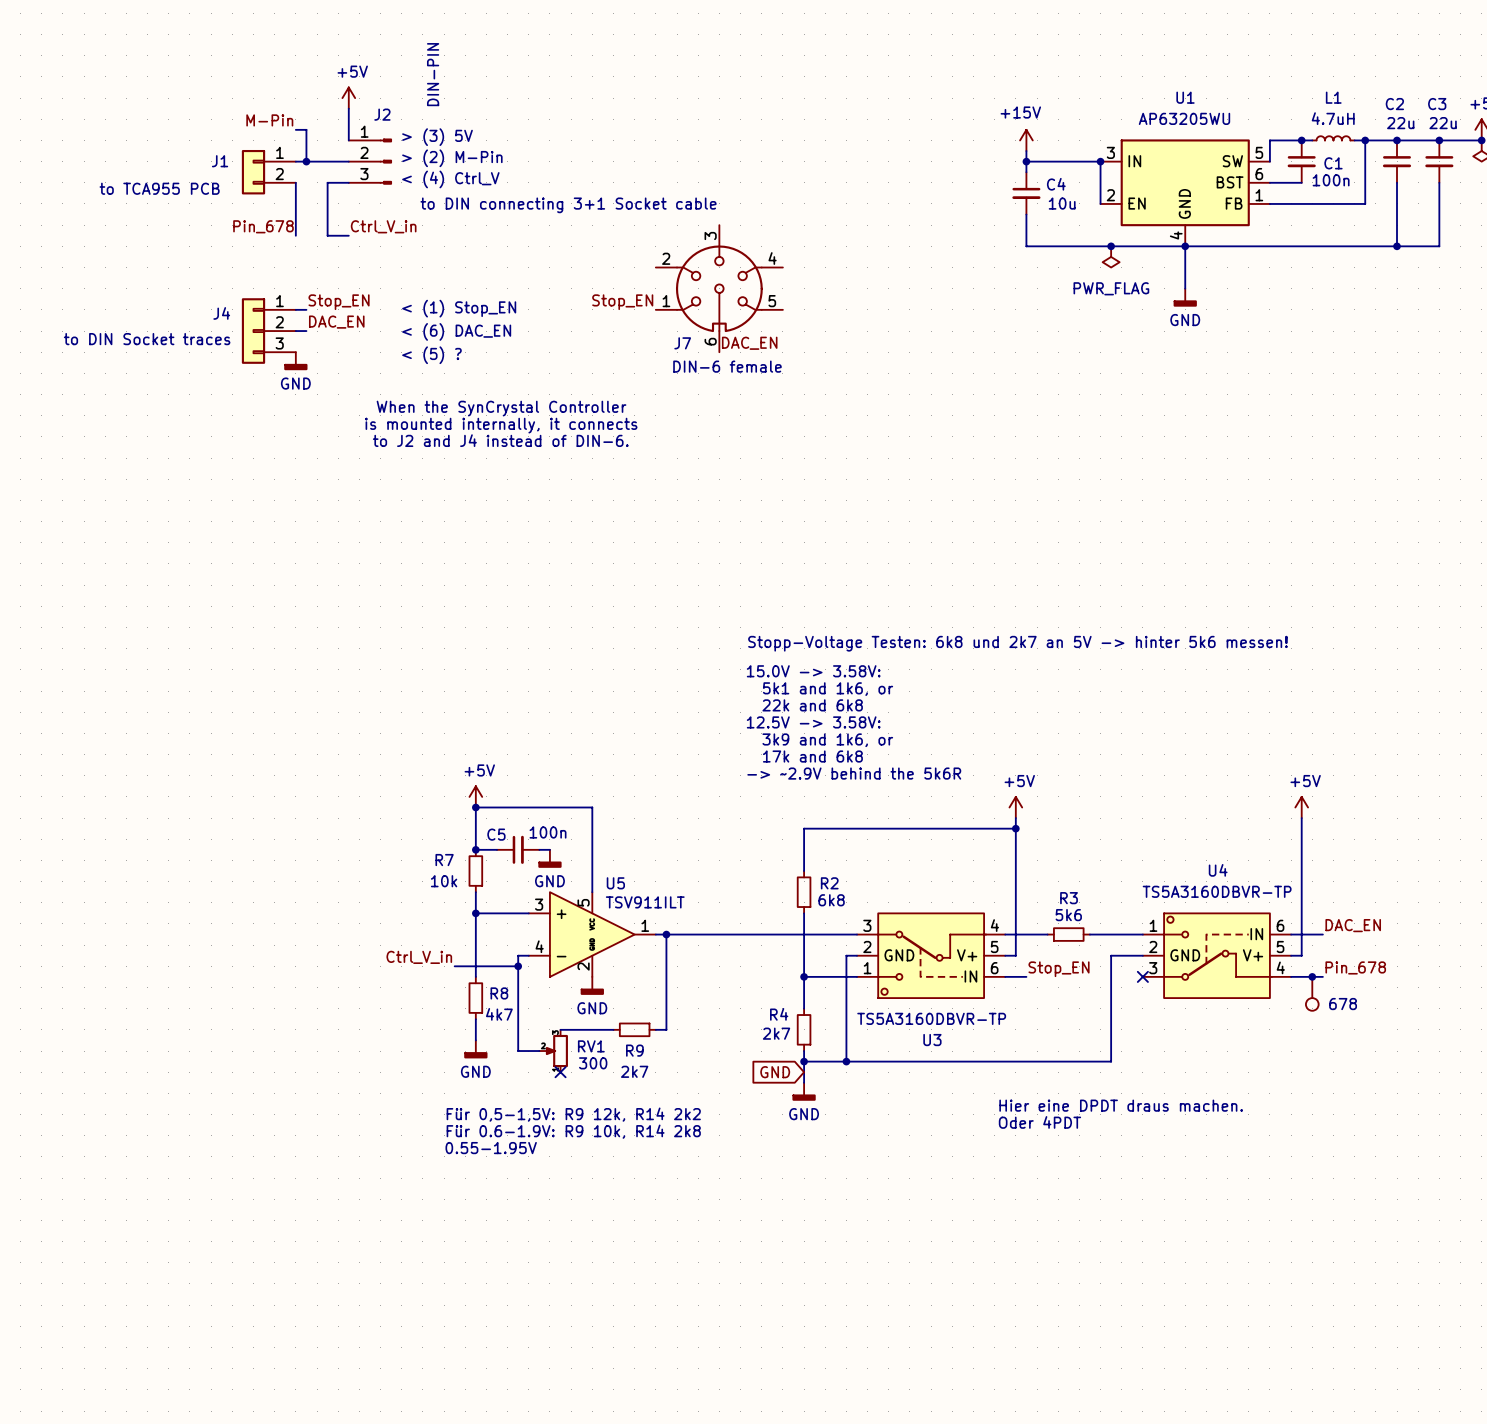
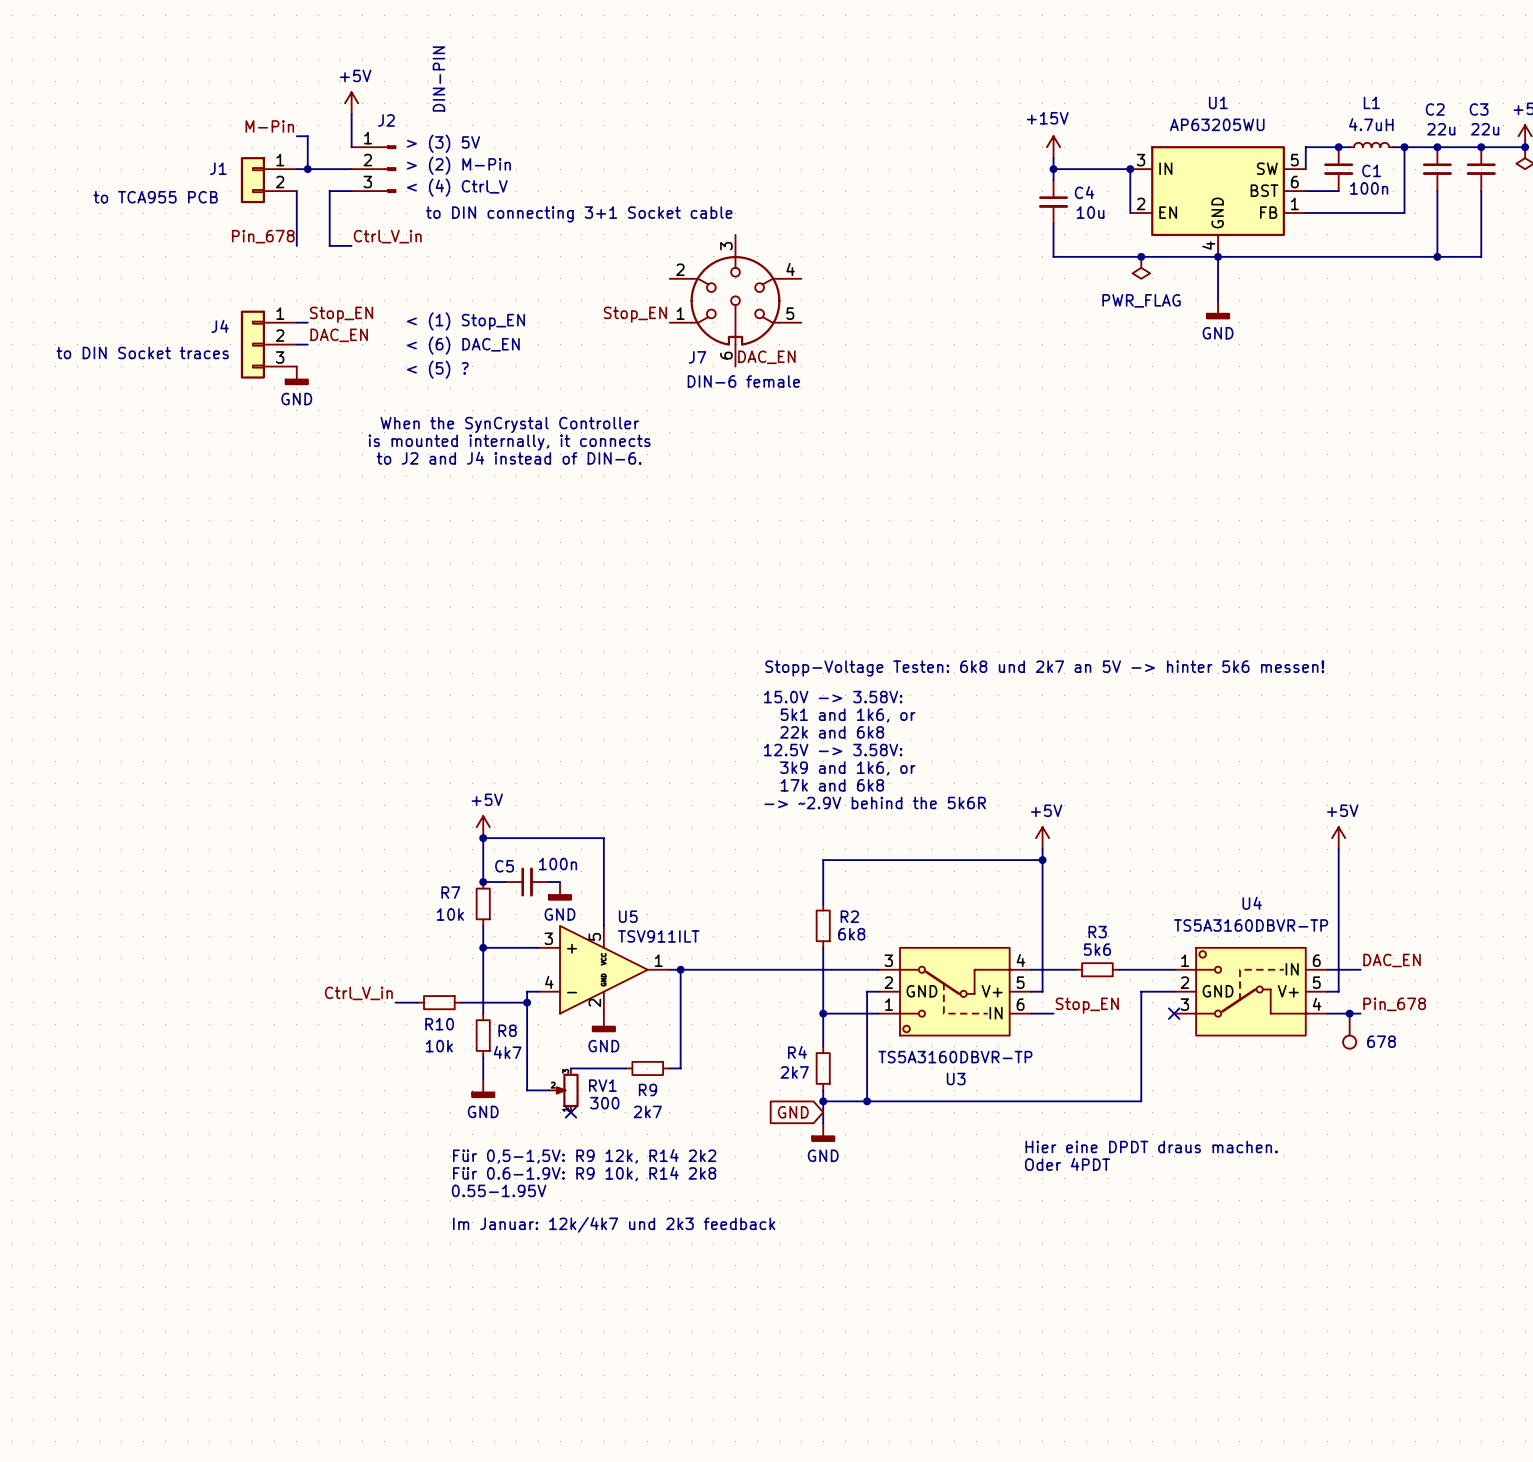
label position: Ctrl_V_in (419, 957) -> Ctrl_V_in (358, 993)
wire: none -> (395, 1002) (417, 1002)
R10: none -> 10k (439, 1002)
text: none -> Im Januar: 12k/4k7 und 2k3 feedback (614, 1224)

